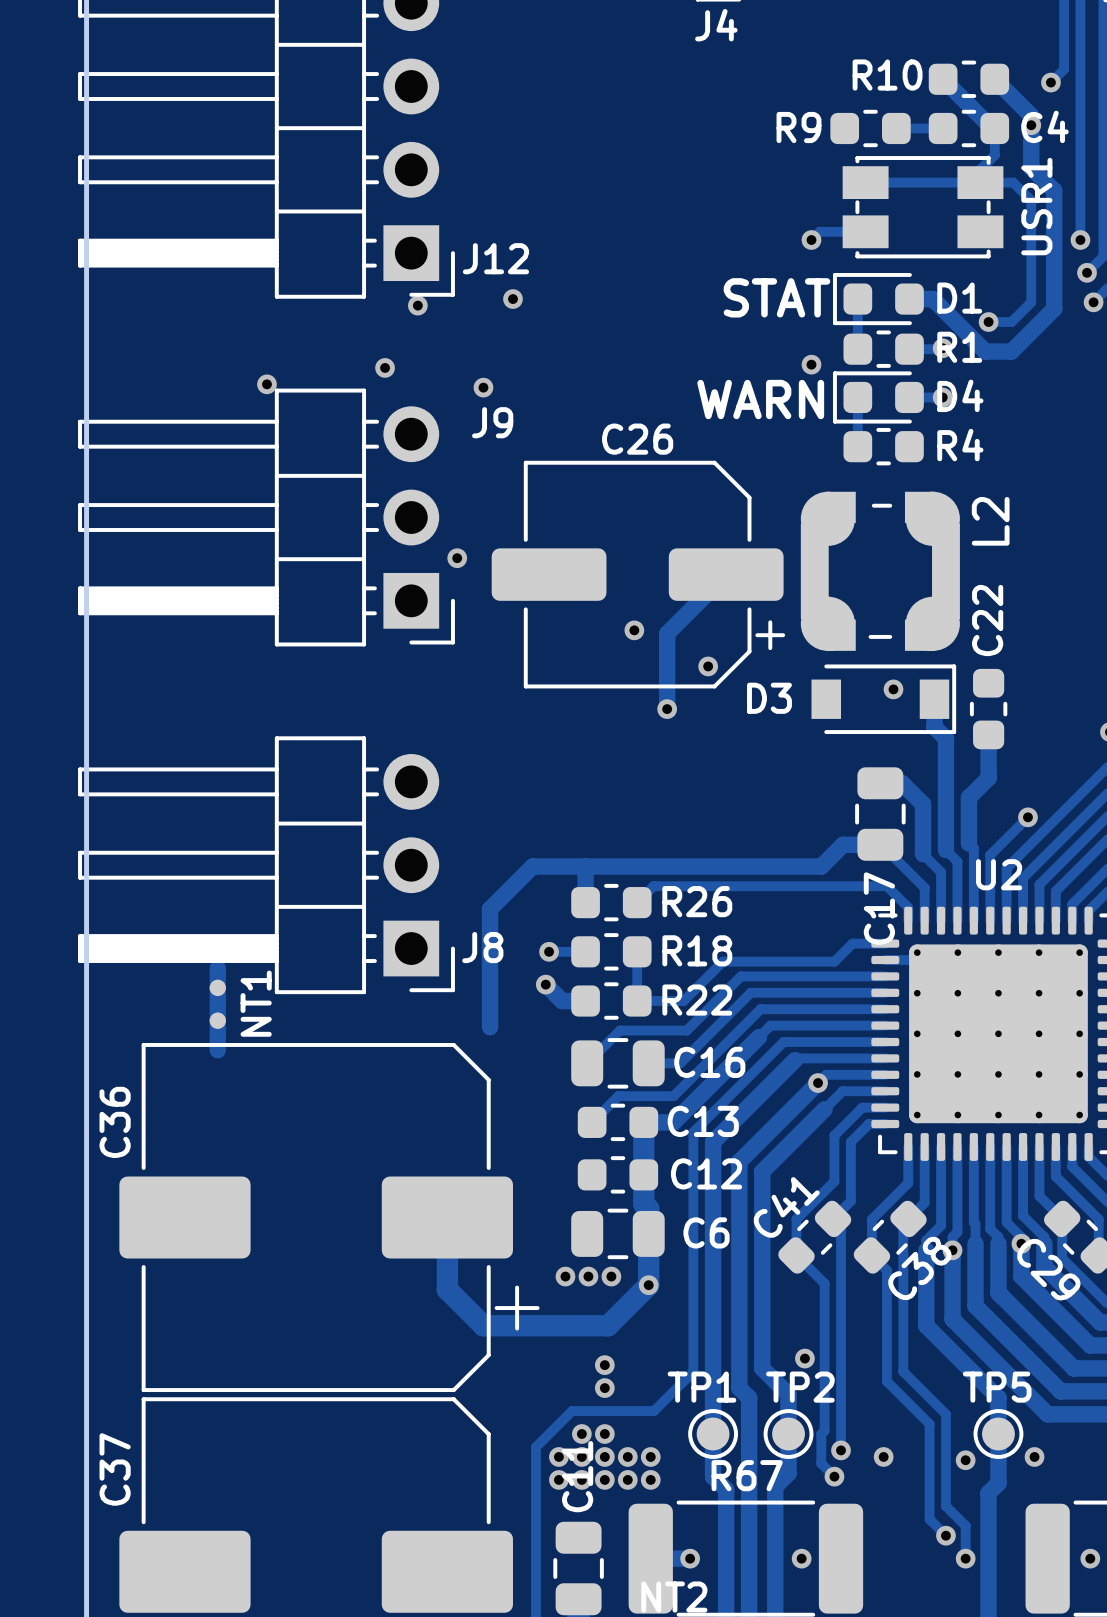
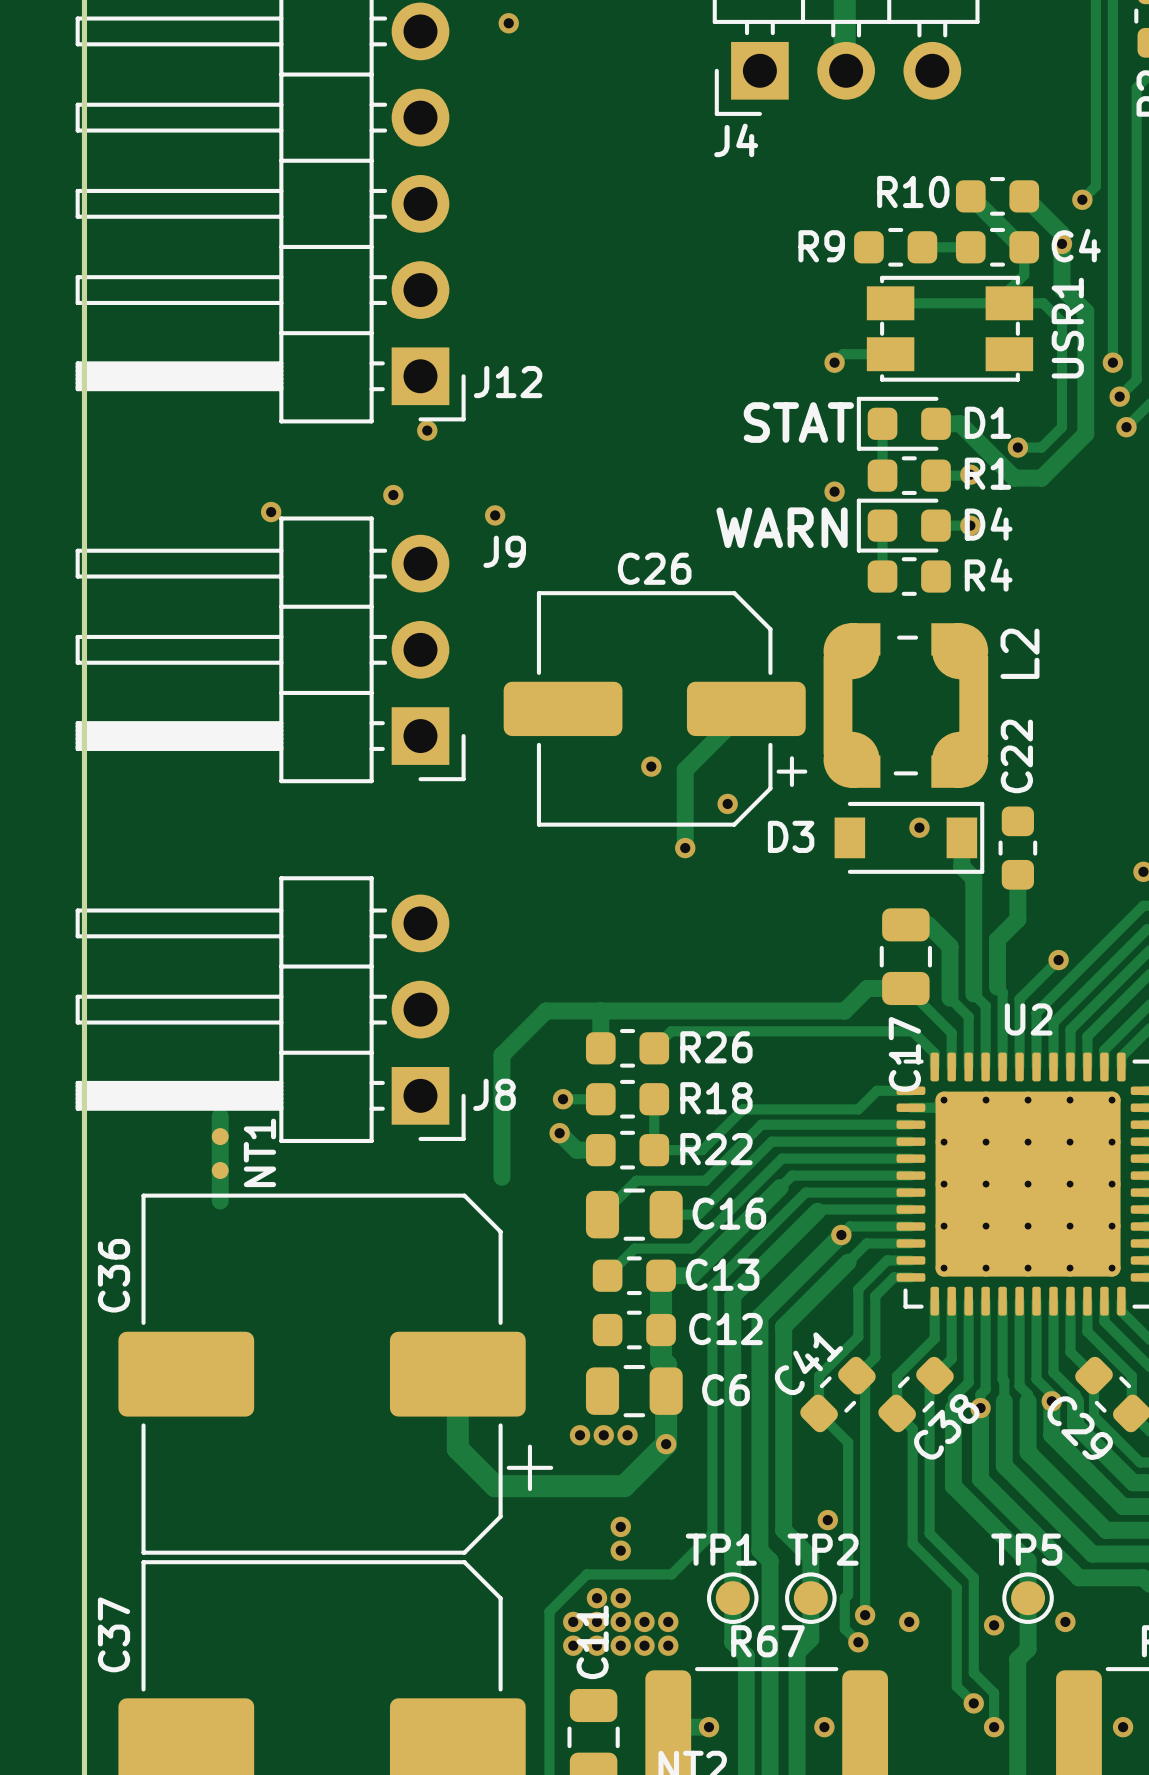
via: (512, 299) -> none
via: (457, 558) -> none

